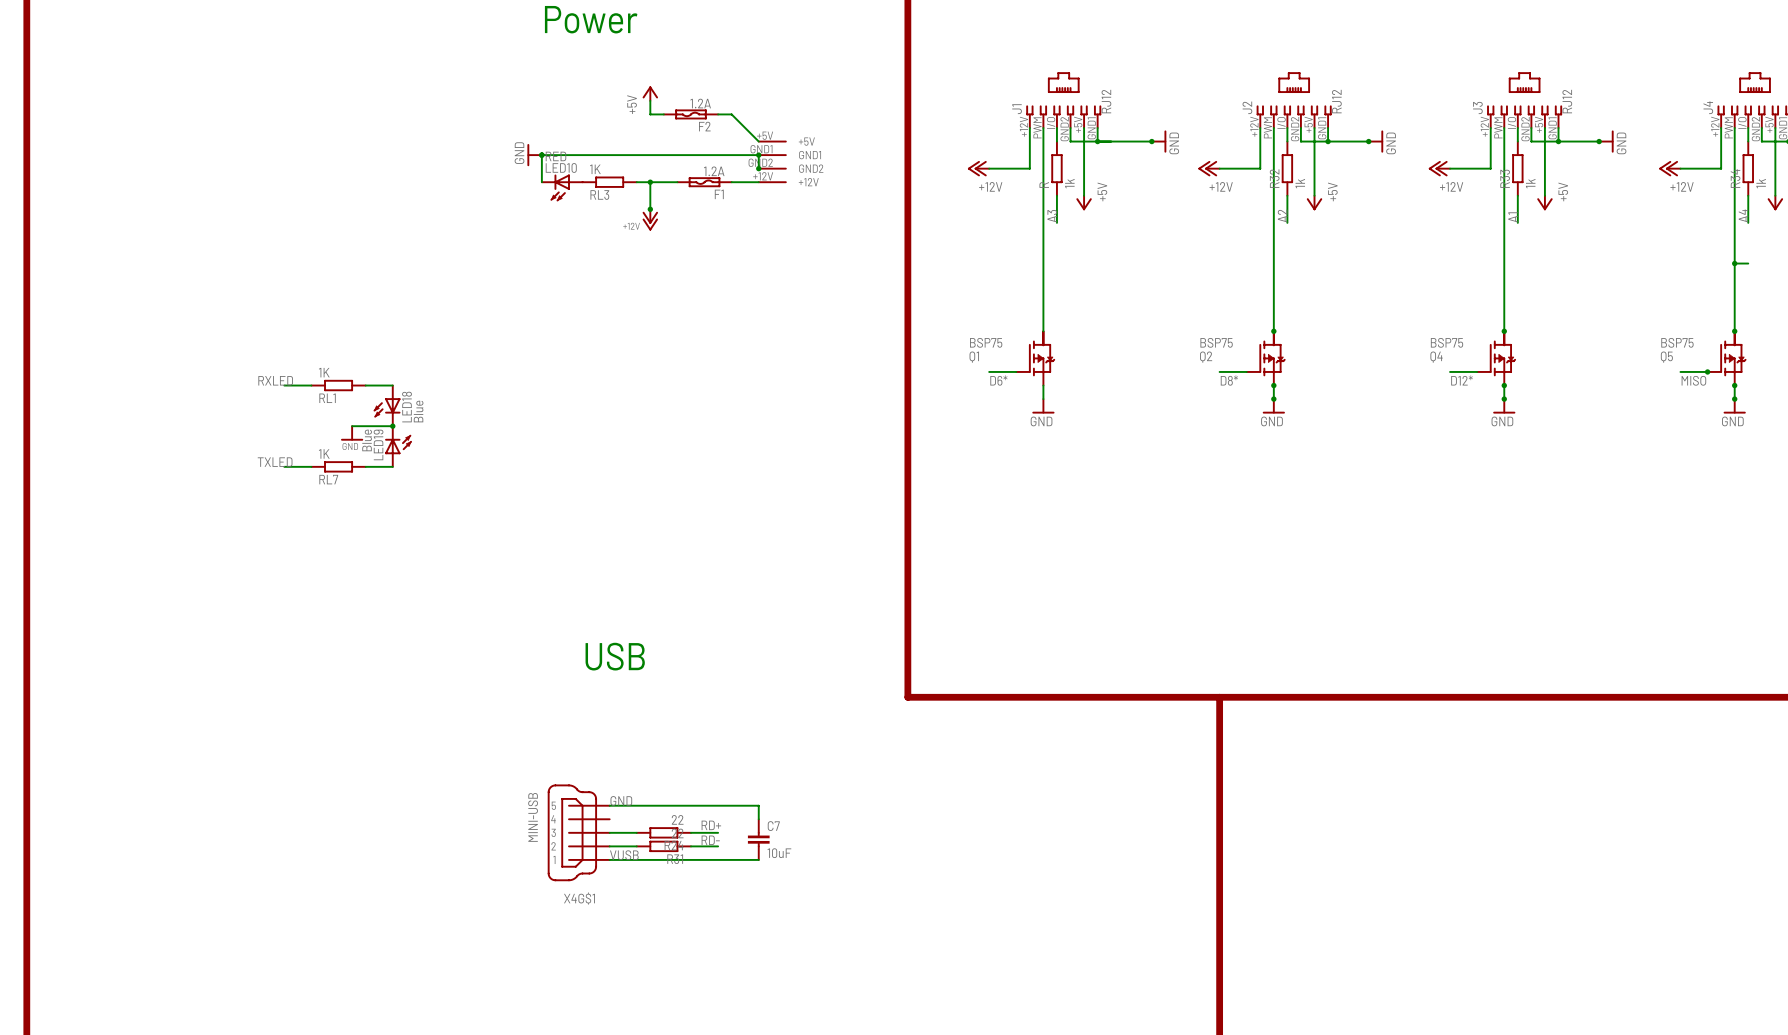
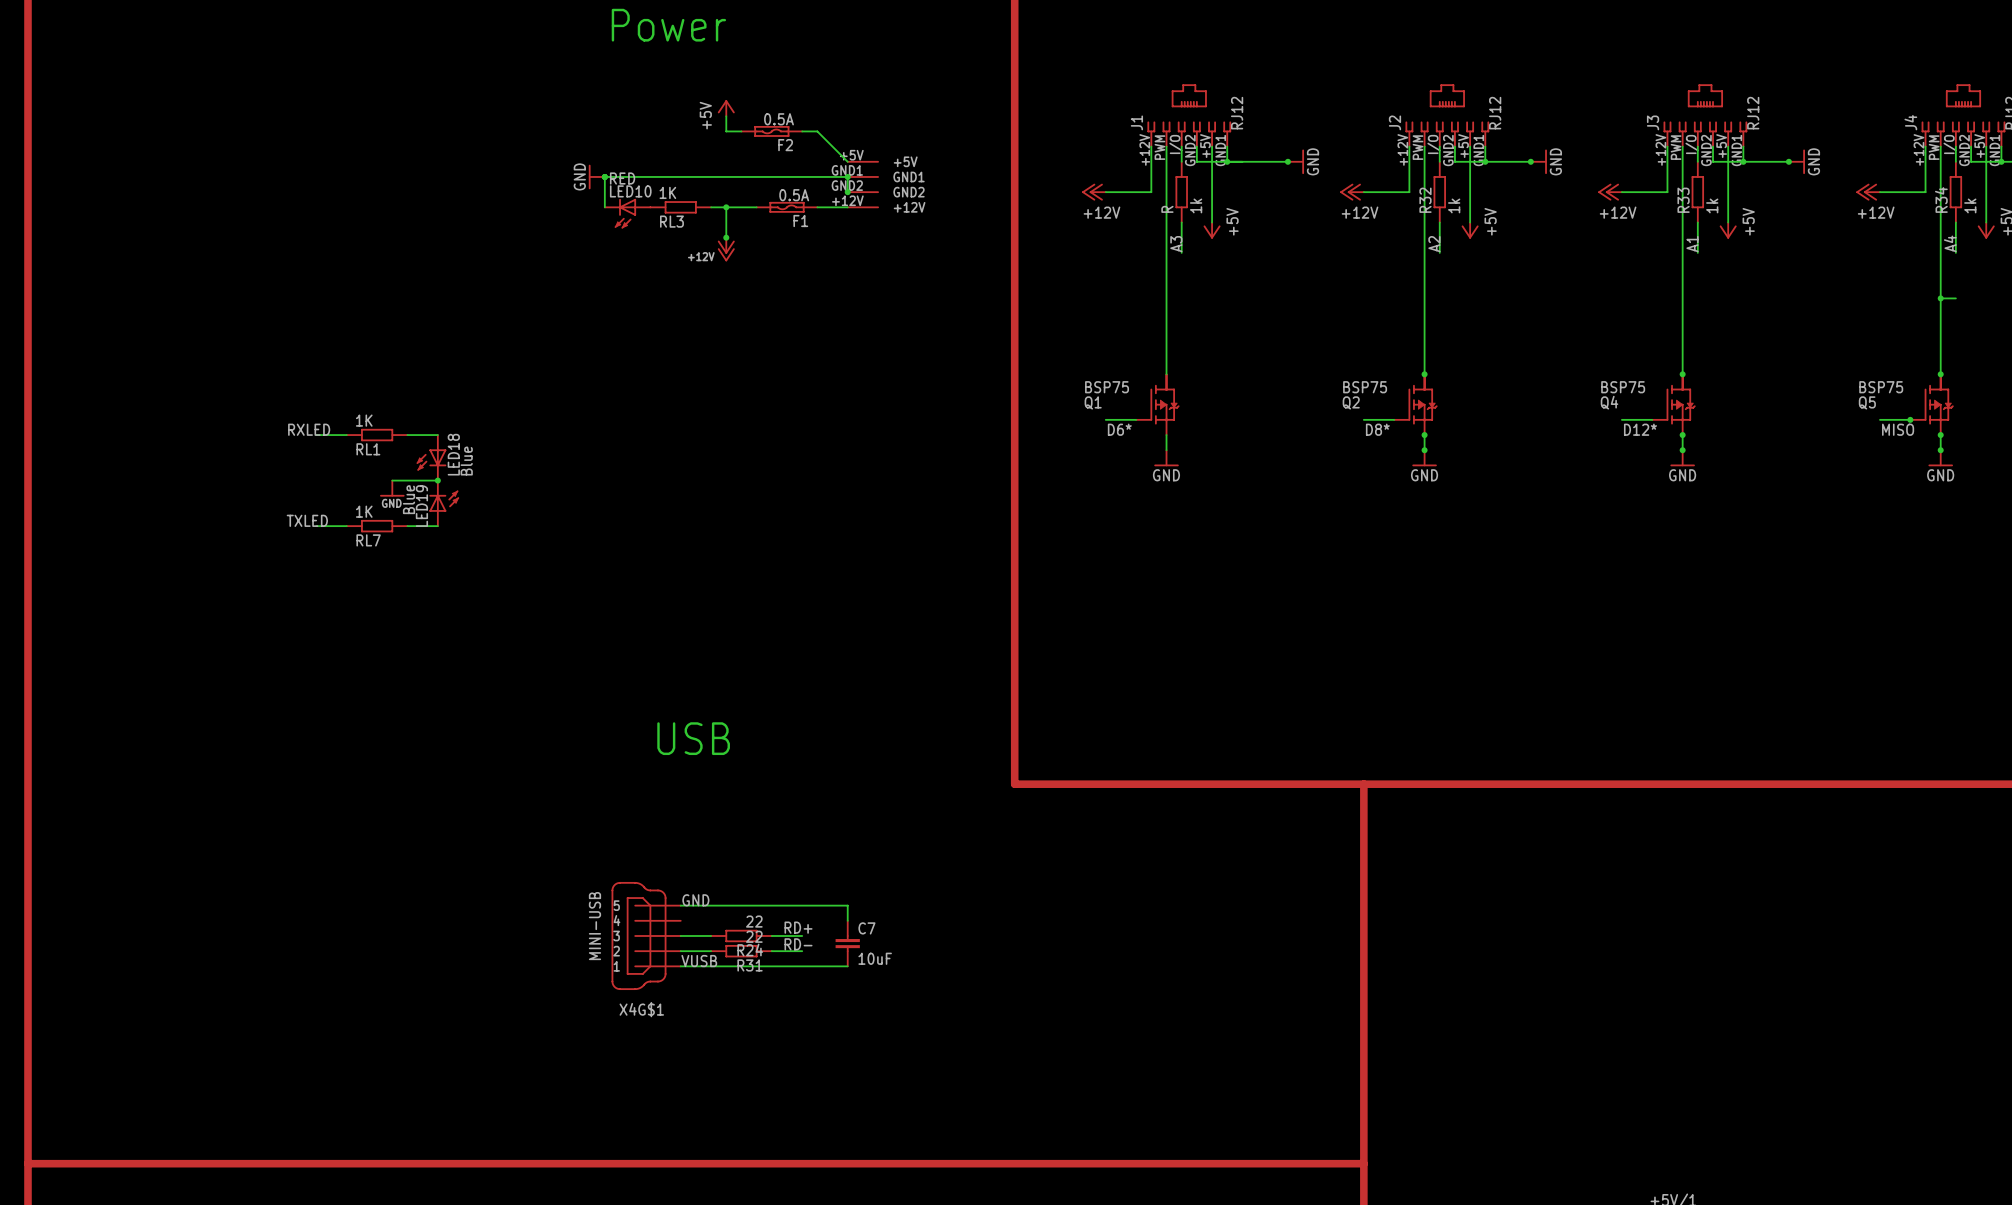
F2 value: 1.2A (700, 103) -> 0.5A (779, 119)
F1 value: 1.2A (714, 171) -> 0.5A (794, 195)

